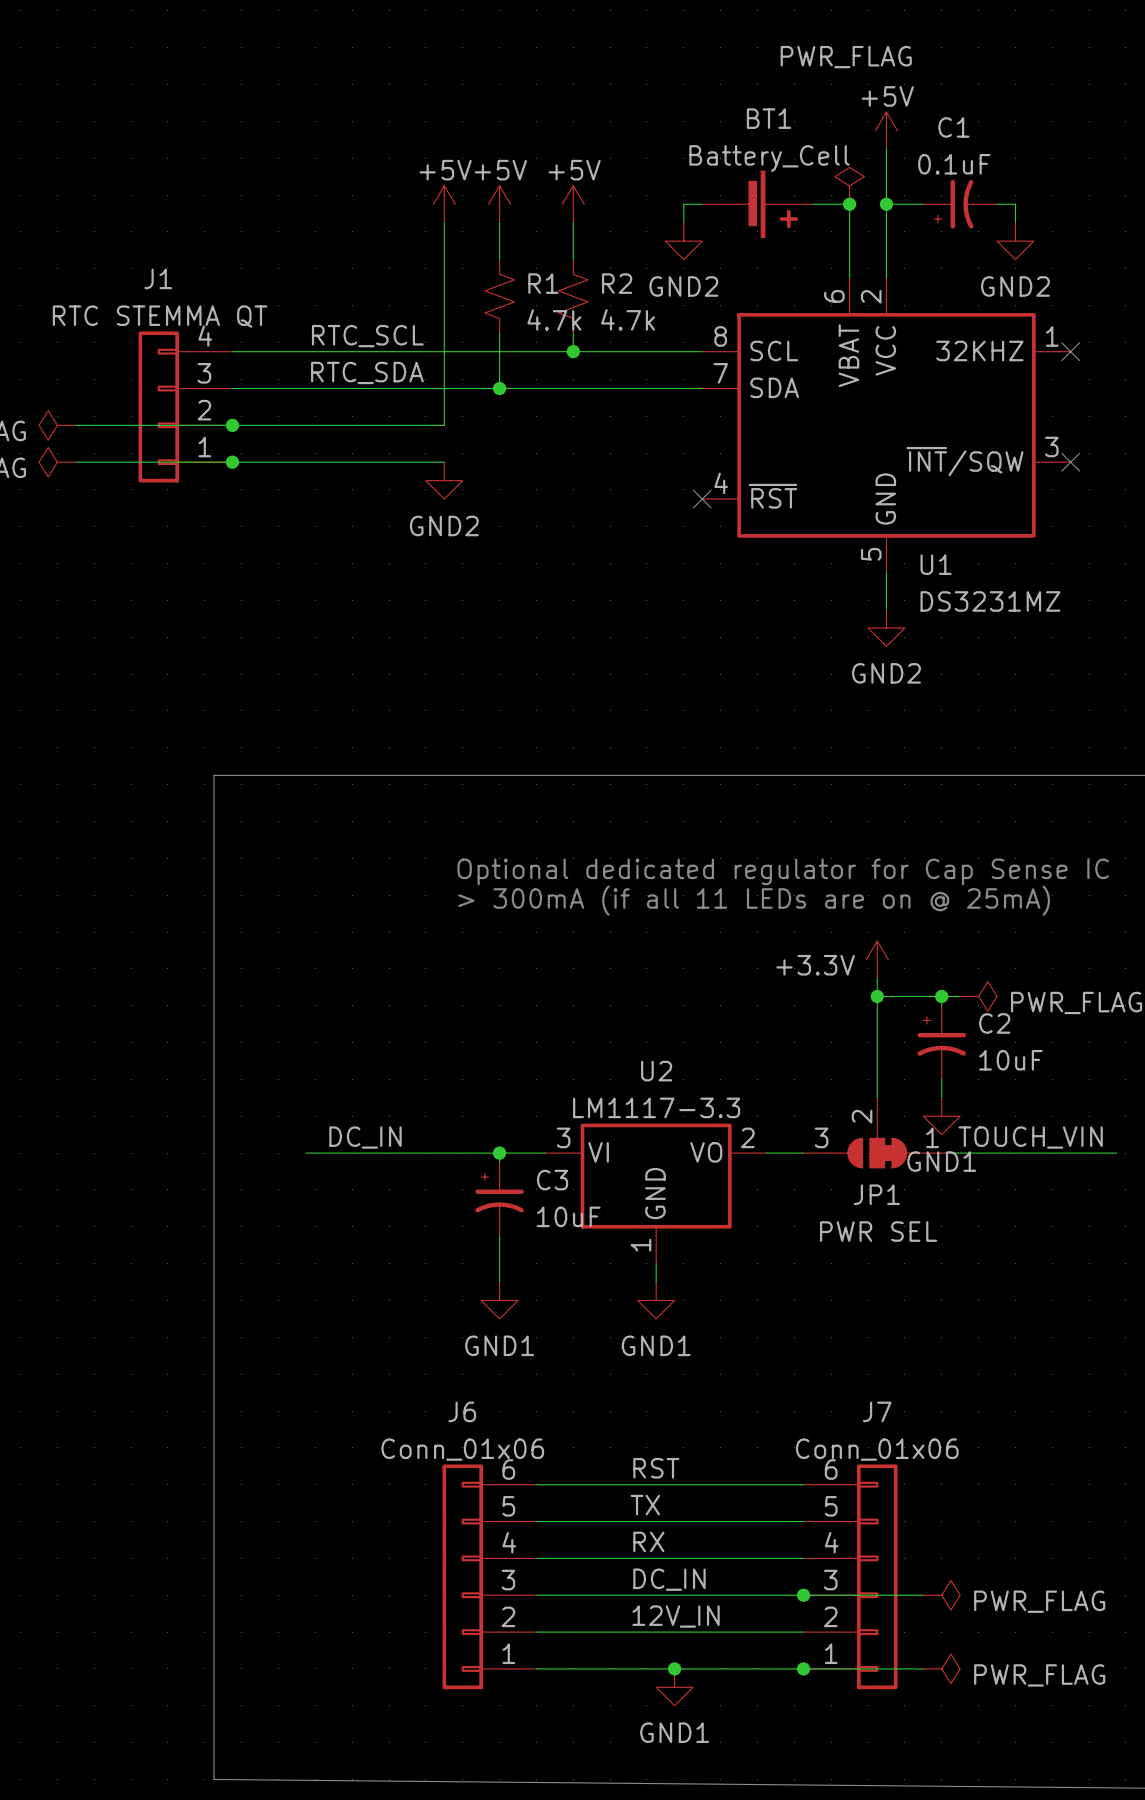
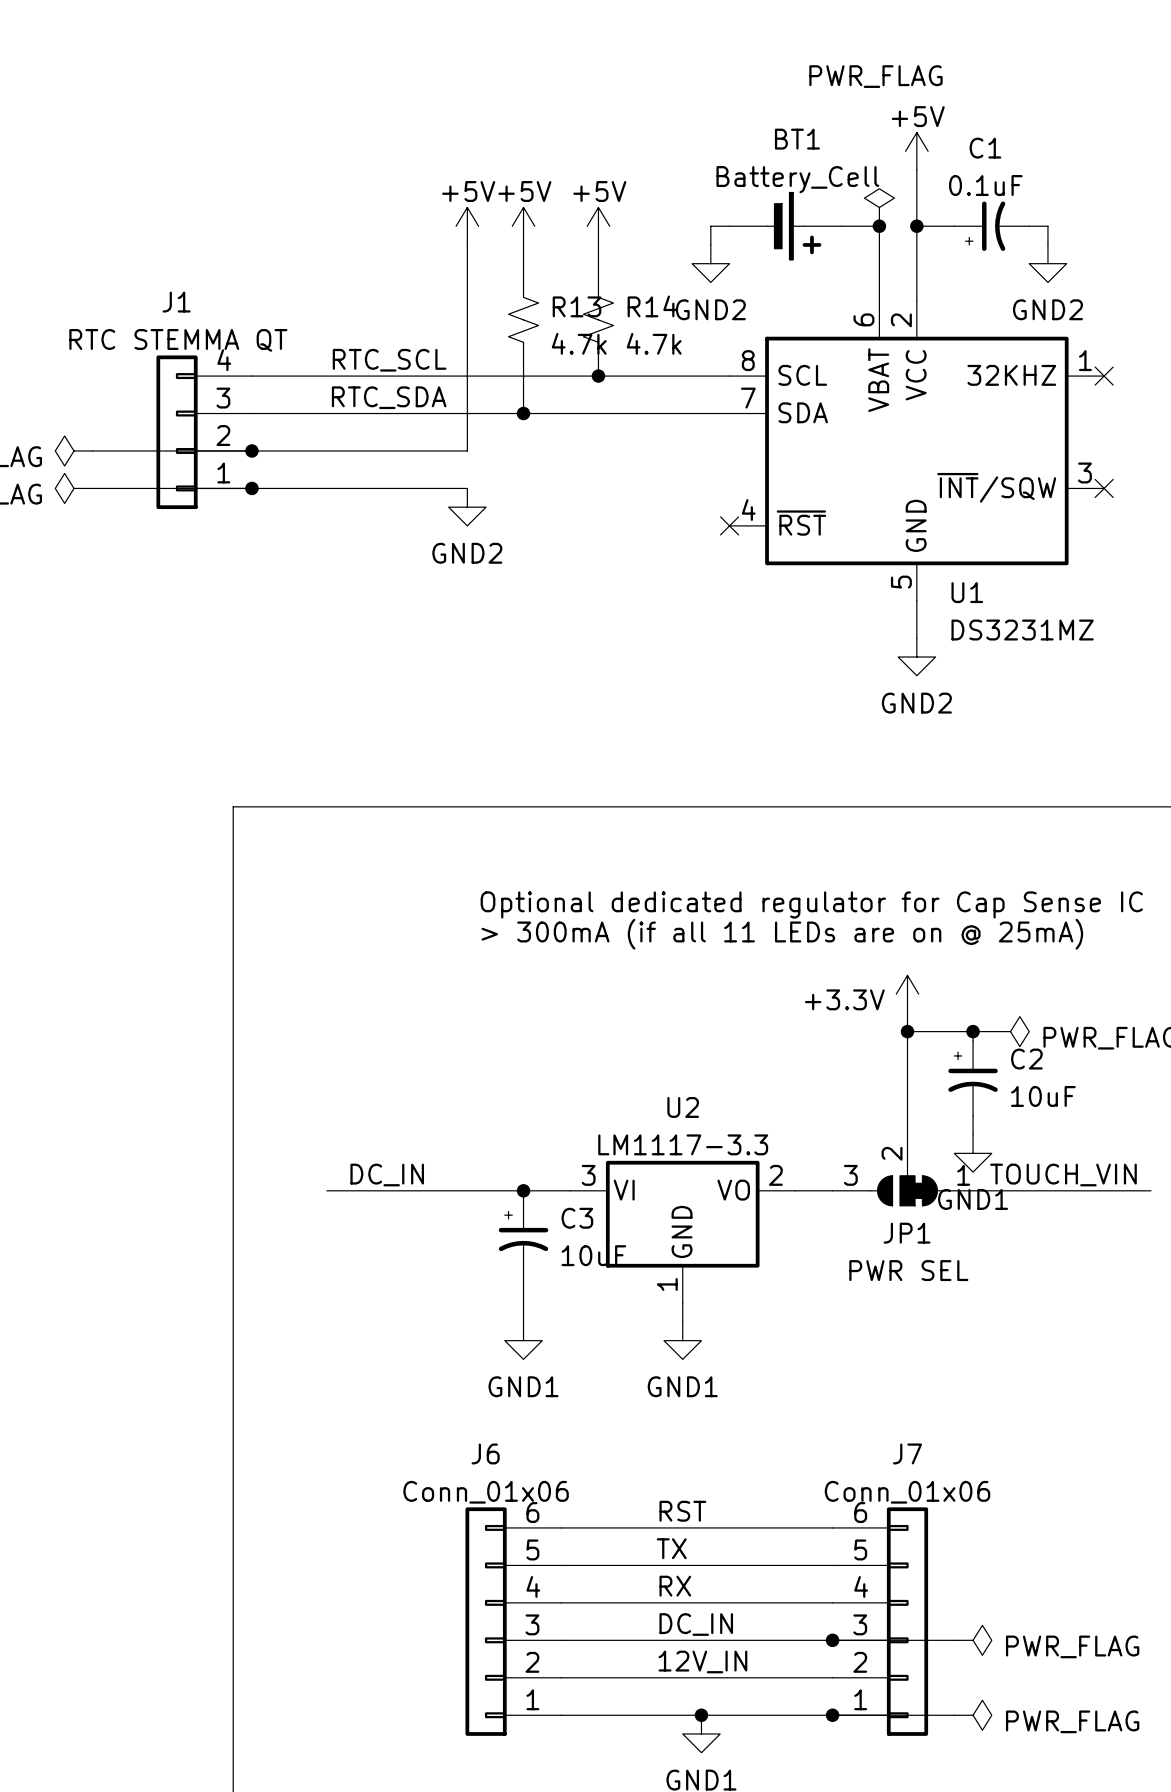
BT1 symbol: [702, 171, 813, 238] -> [729, 192, 842, 260]
R1 name: R1 (543, 283) -> R13 (577, 306)
R2 name: R2 (617, 283) -> R14 (652, 306)

